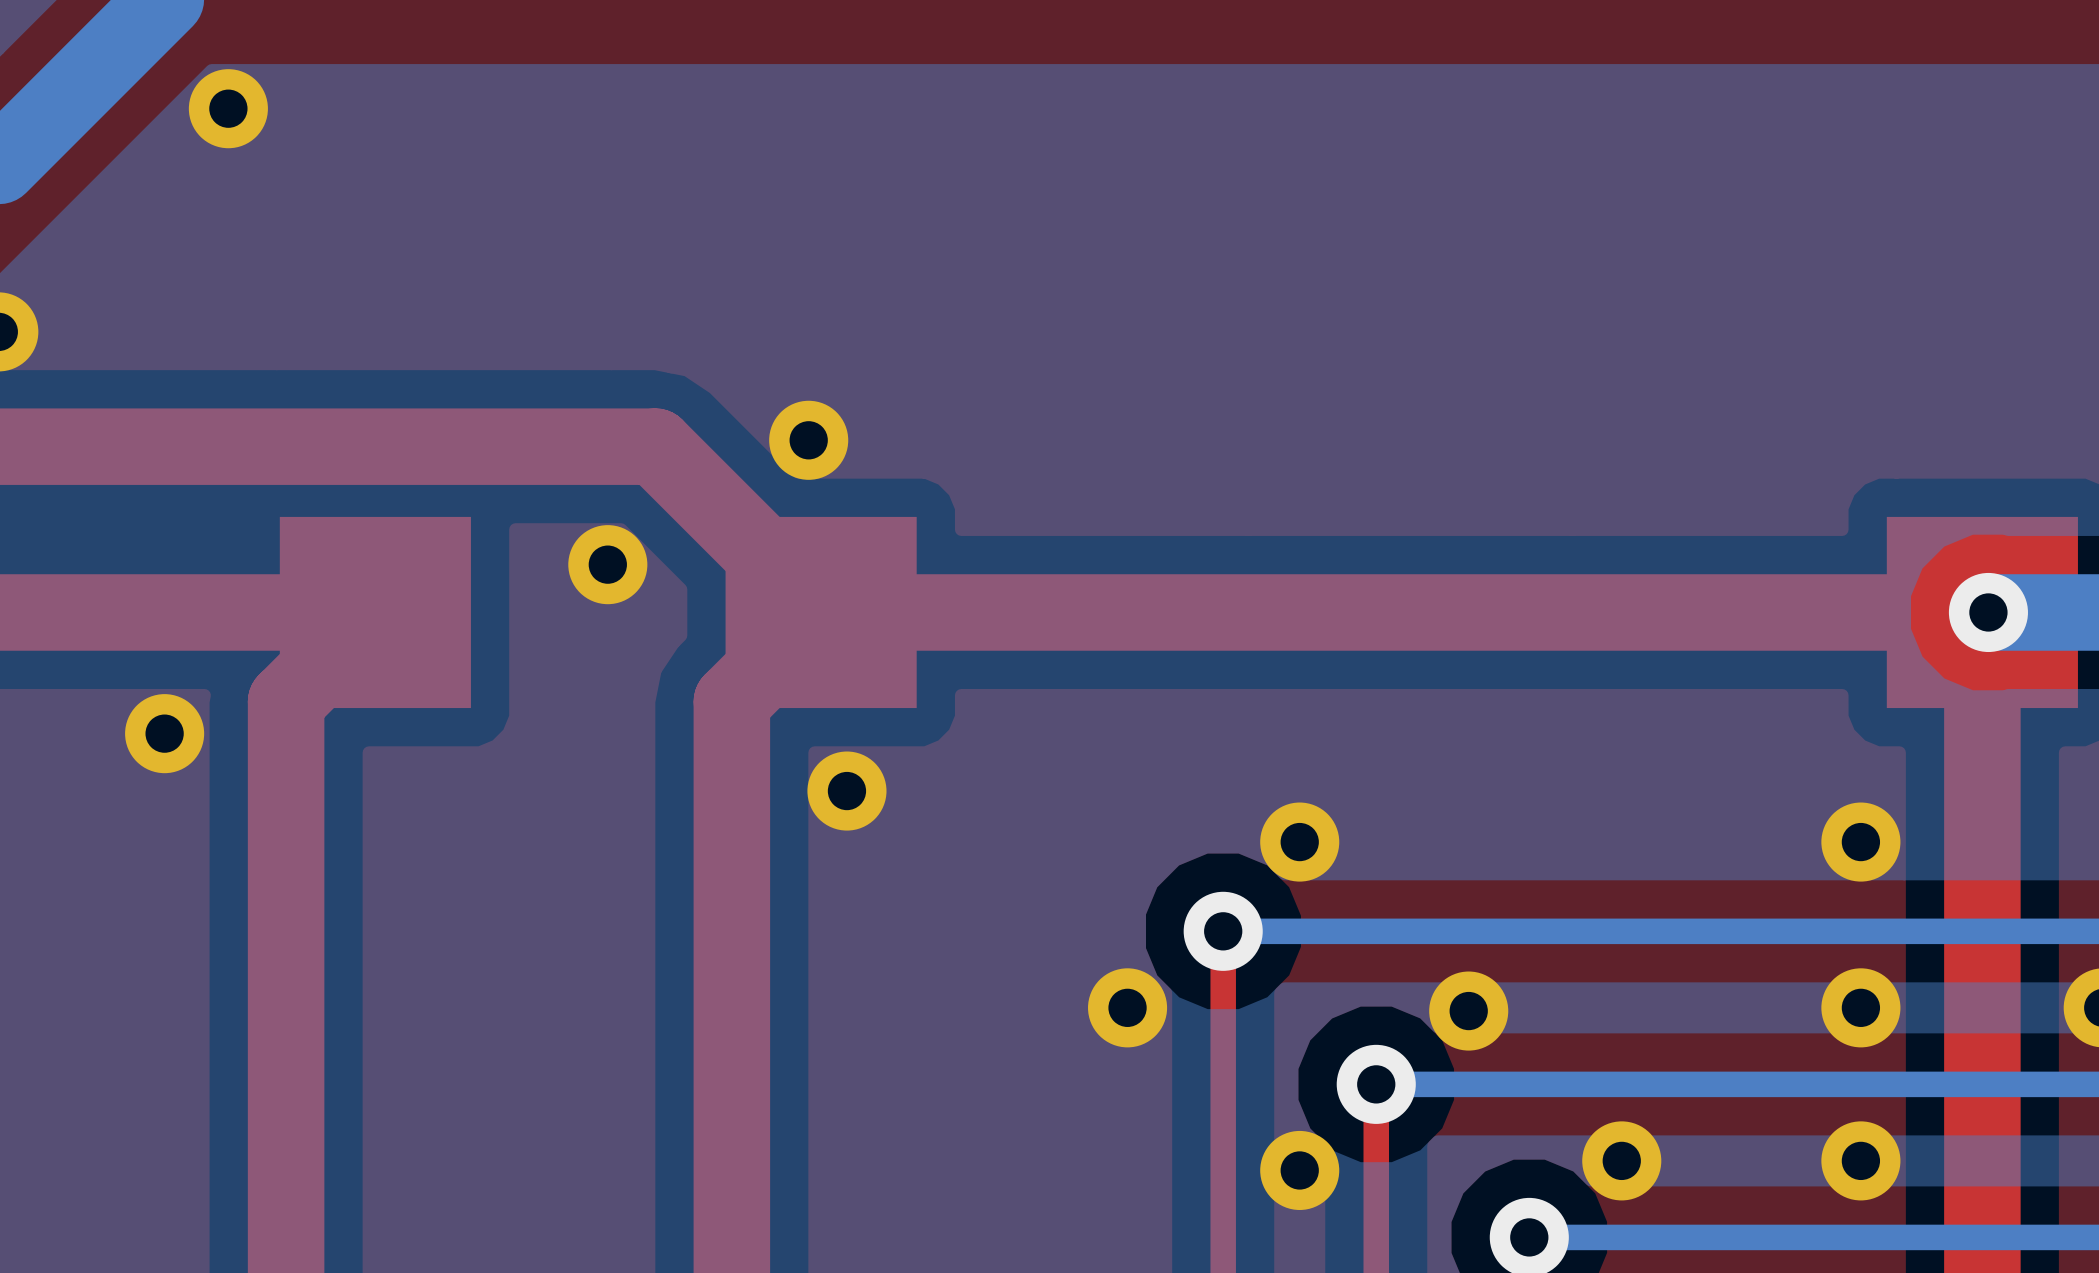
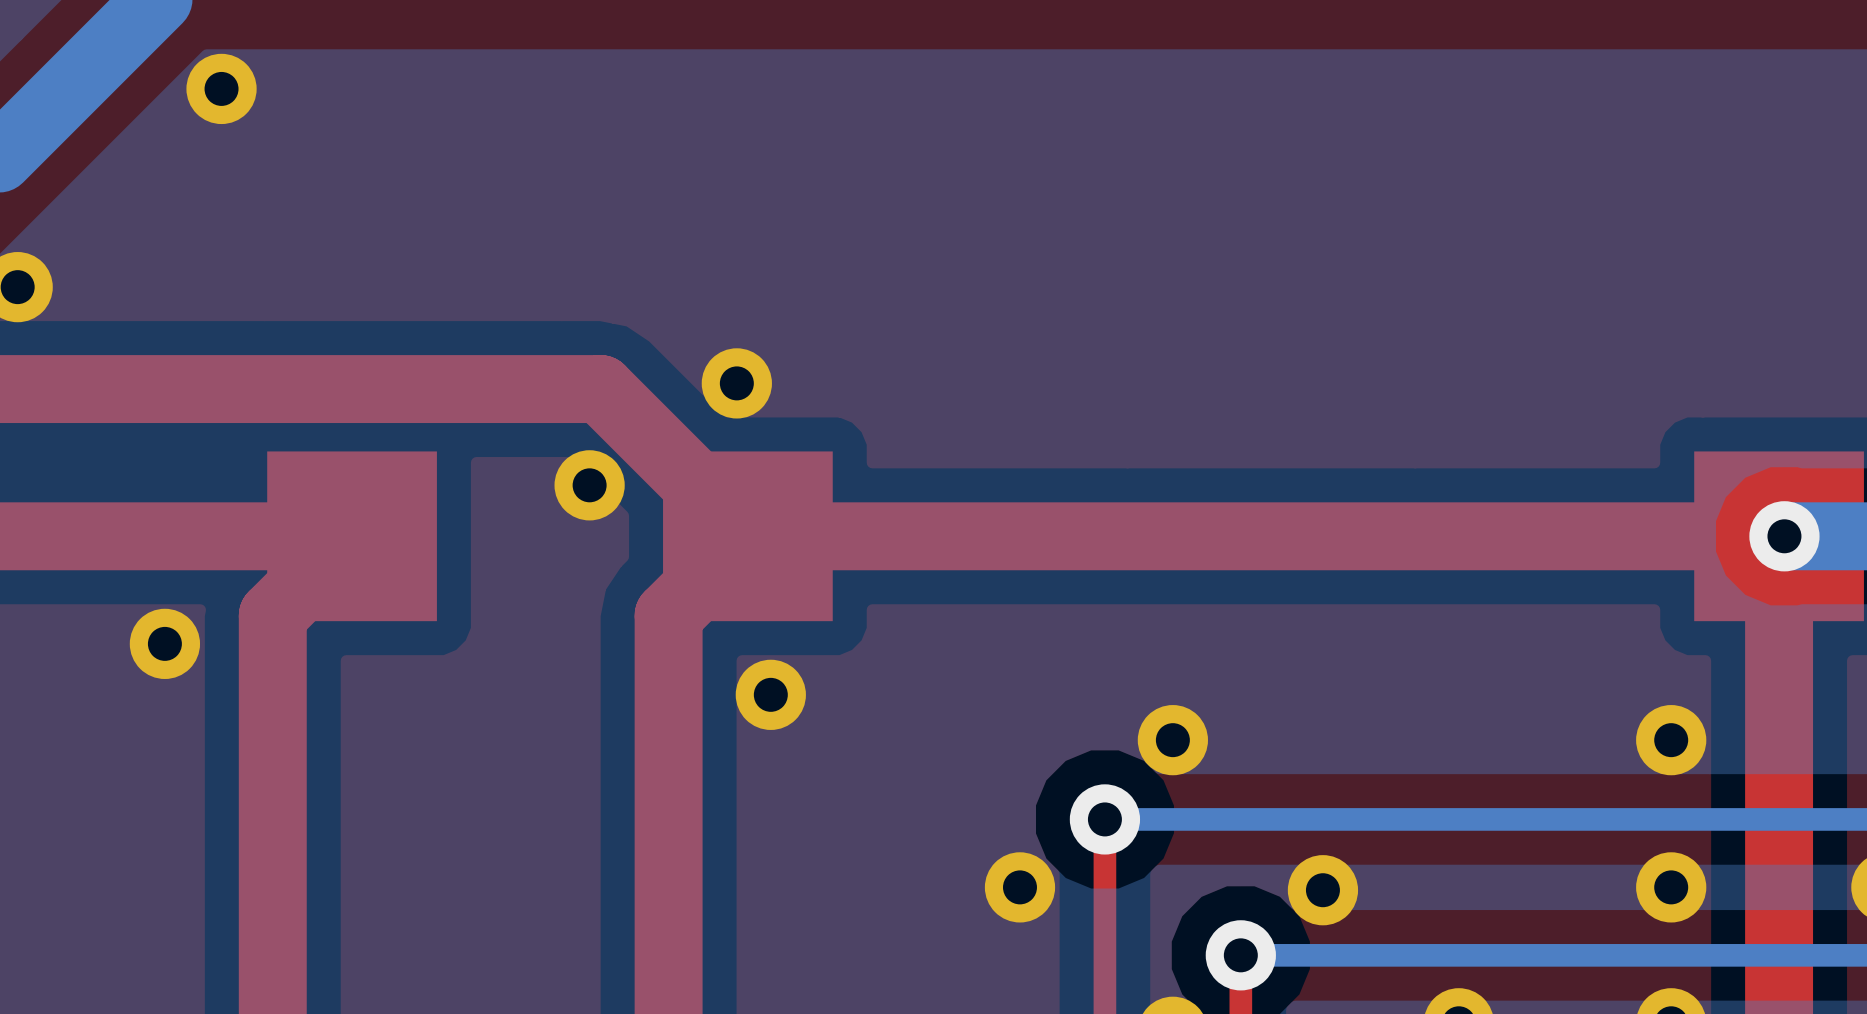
part position: (607, 564) -> (589, 485)

